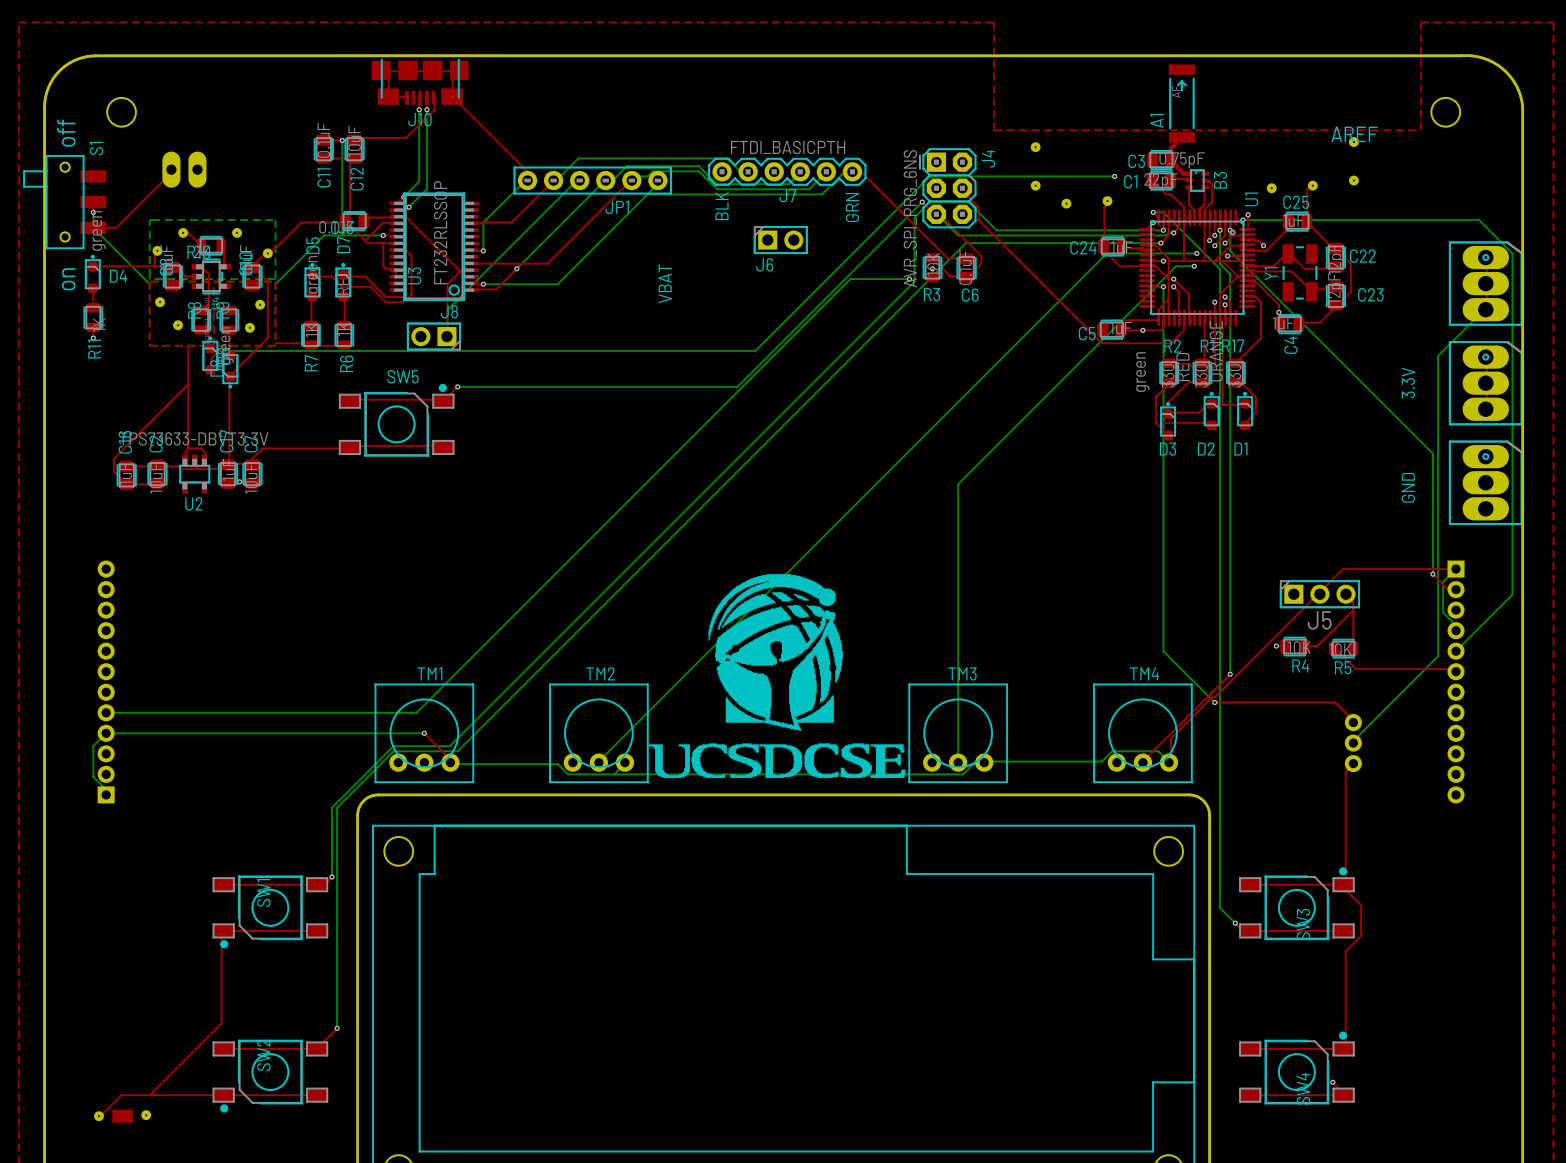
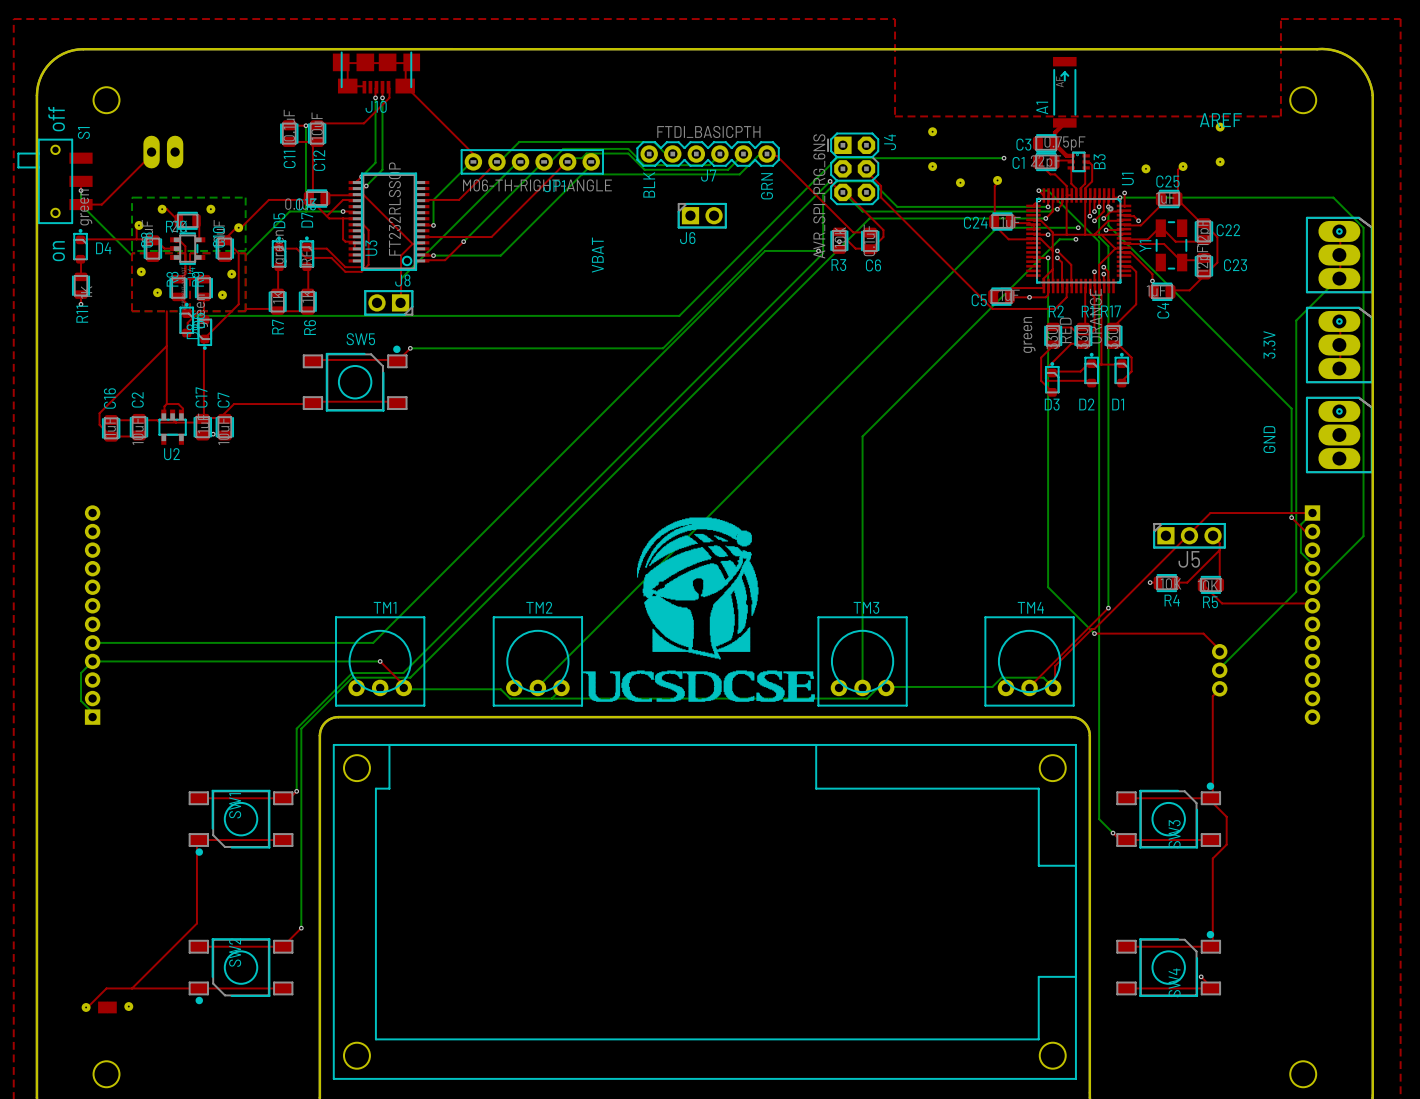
JP1 value: none -> M06-TH-RIGHT-ANGLE (537, 185)
U2 value: TPS73633-DBVT3.3V (193, 438) -> none

